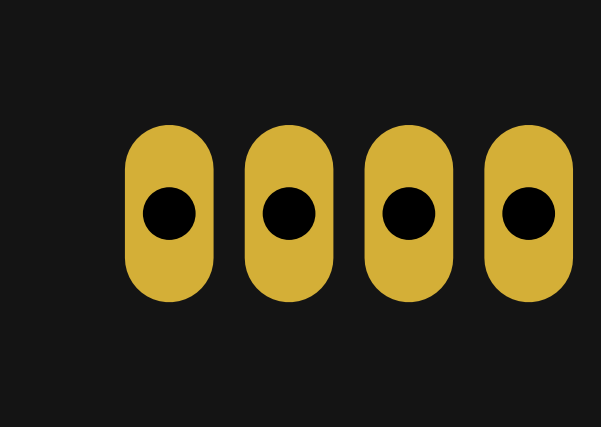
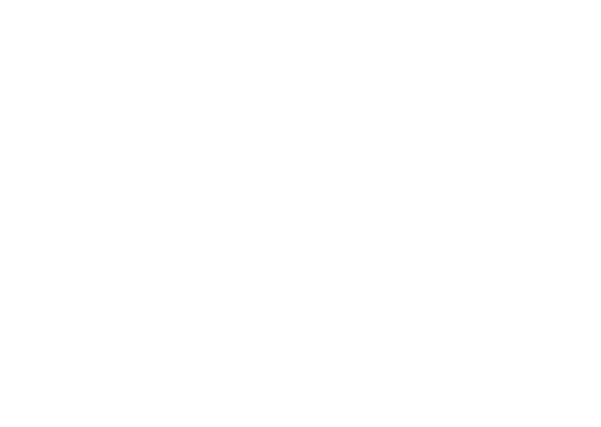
part: (348, 213) -> none

